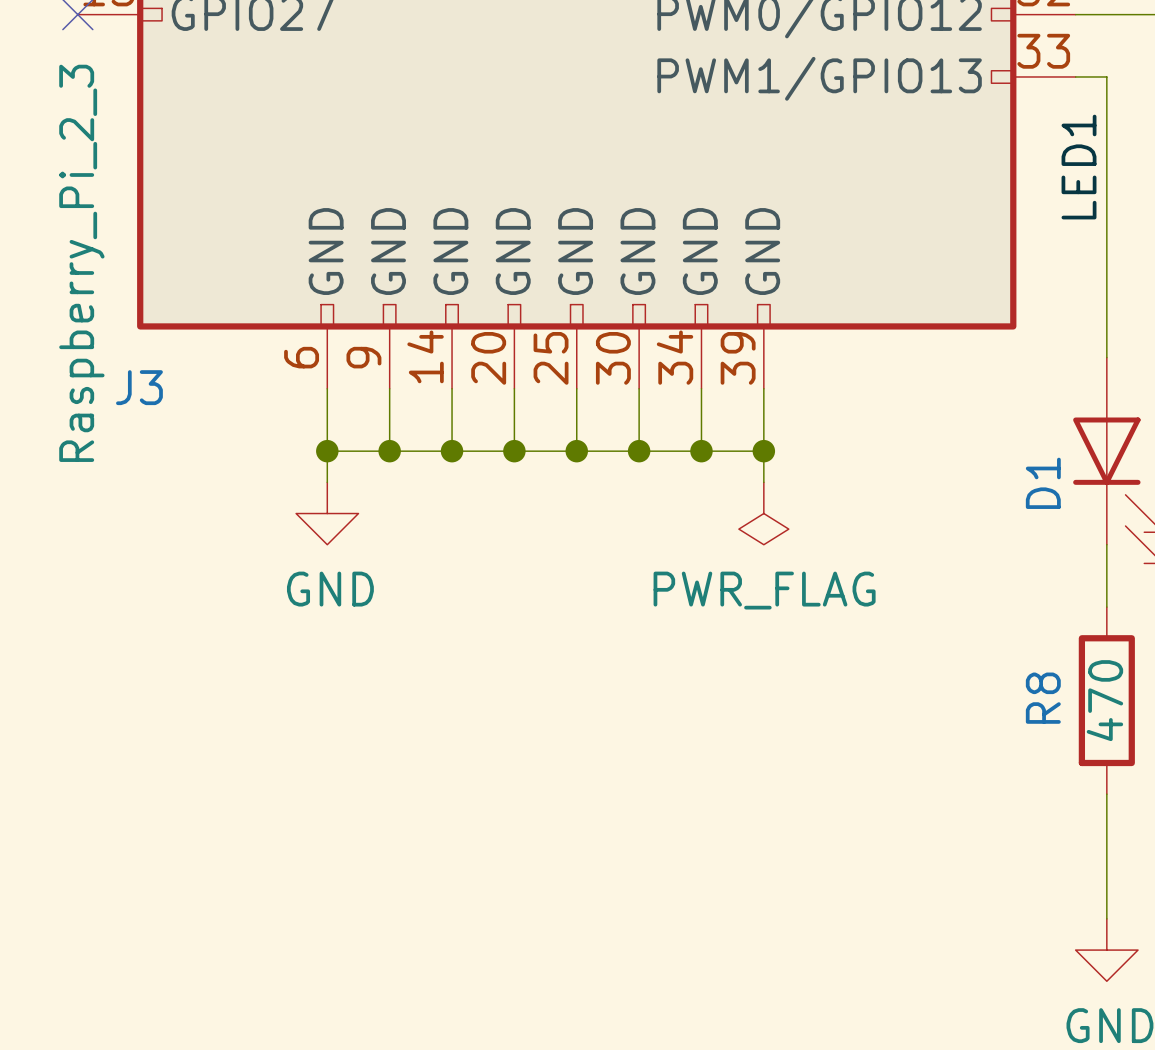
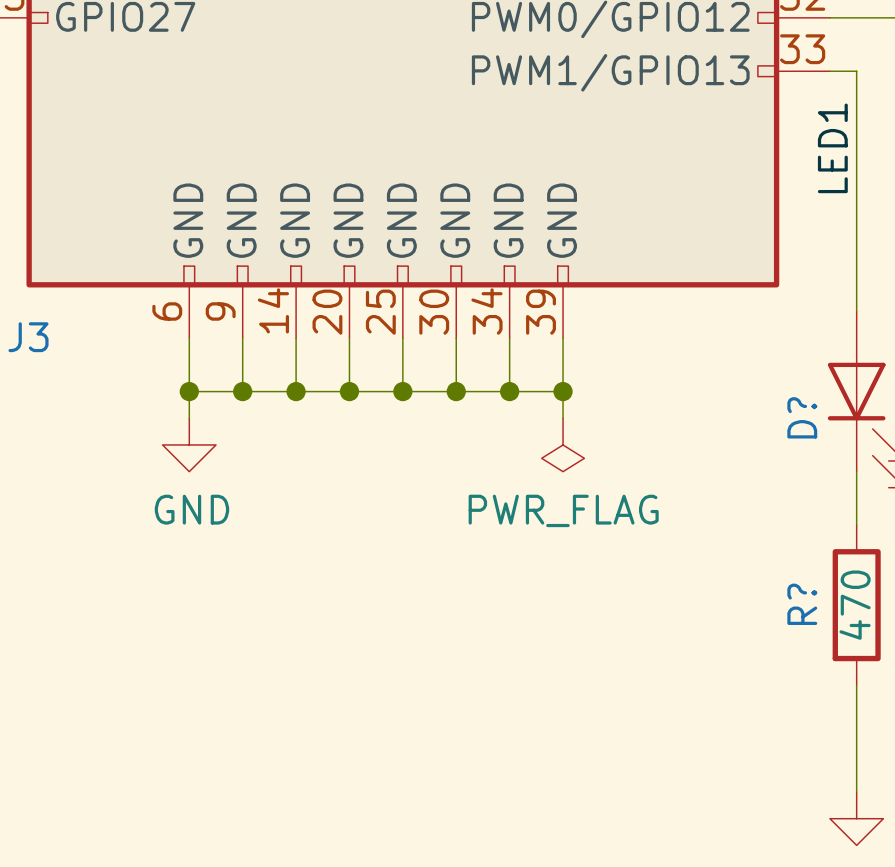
D1 name: D1 (1043, 483) -> D? (802, 417)
R8 name: R8 (1043, 698) -> R? (802, 604)

